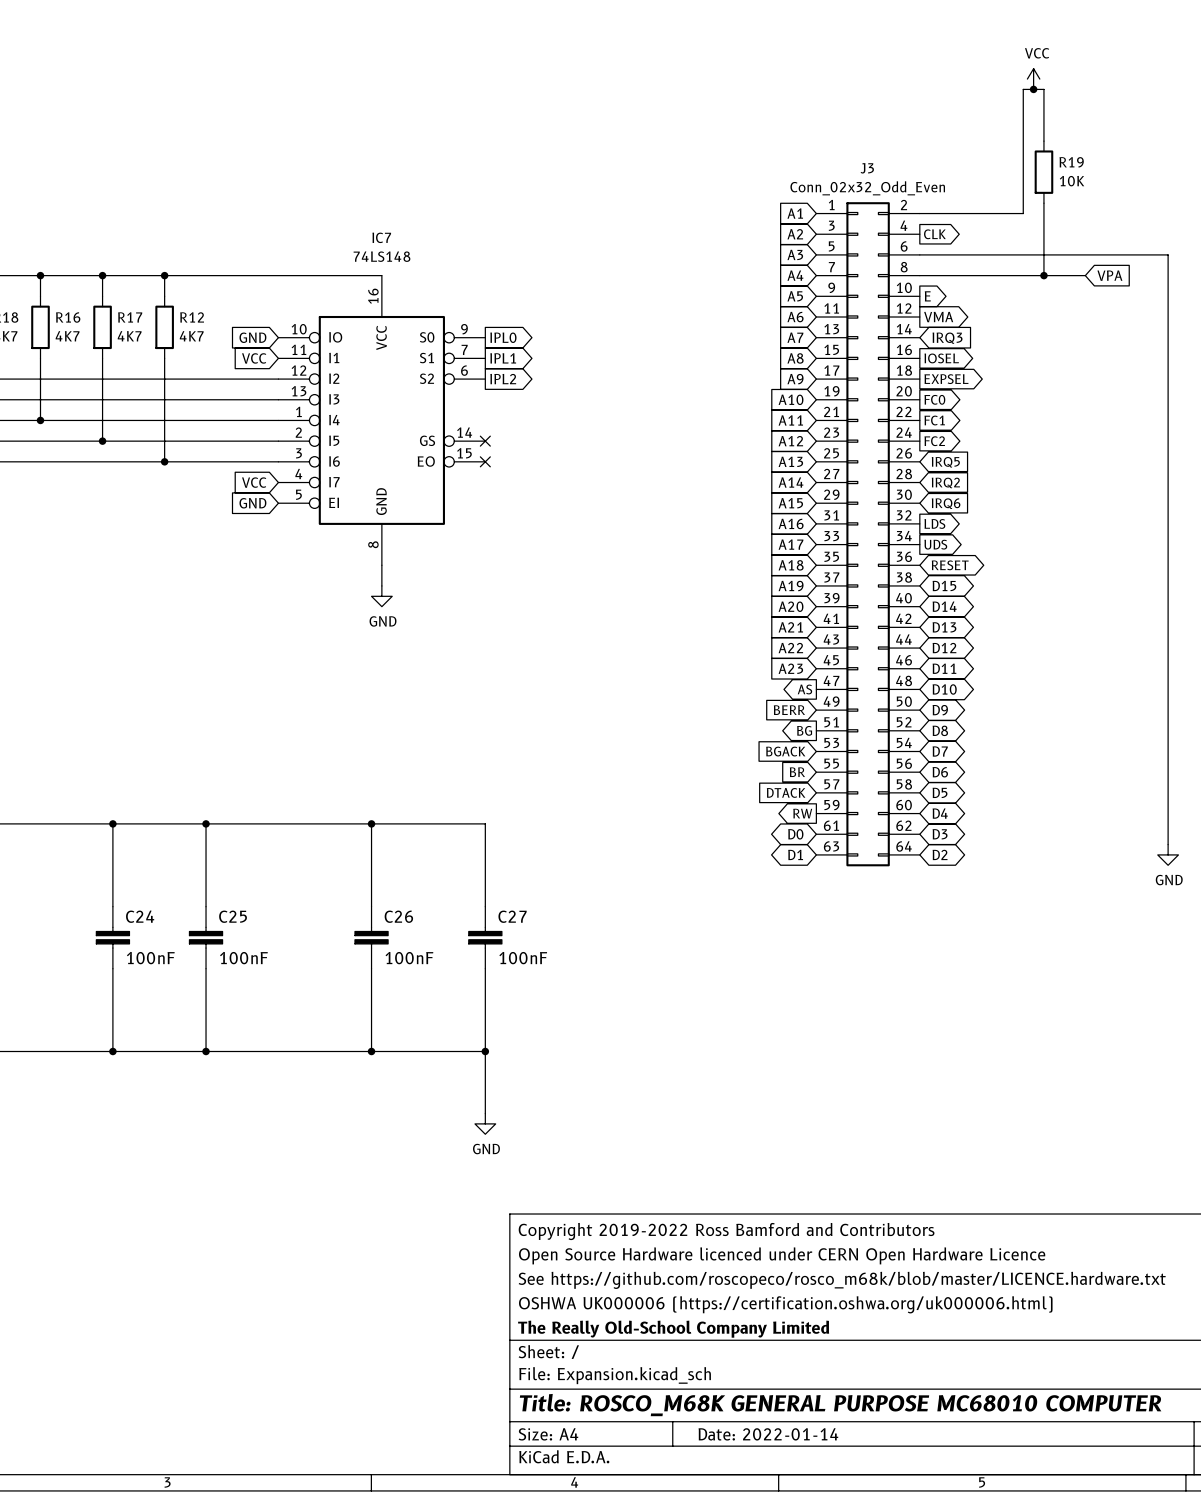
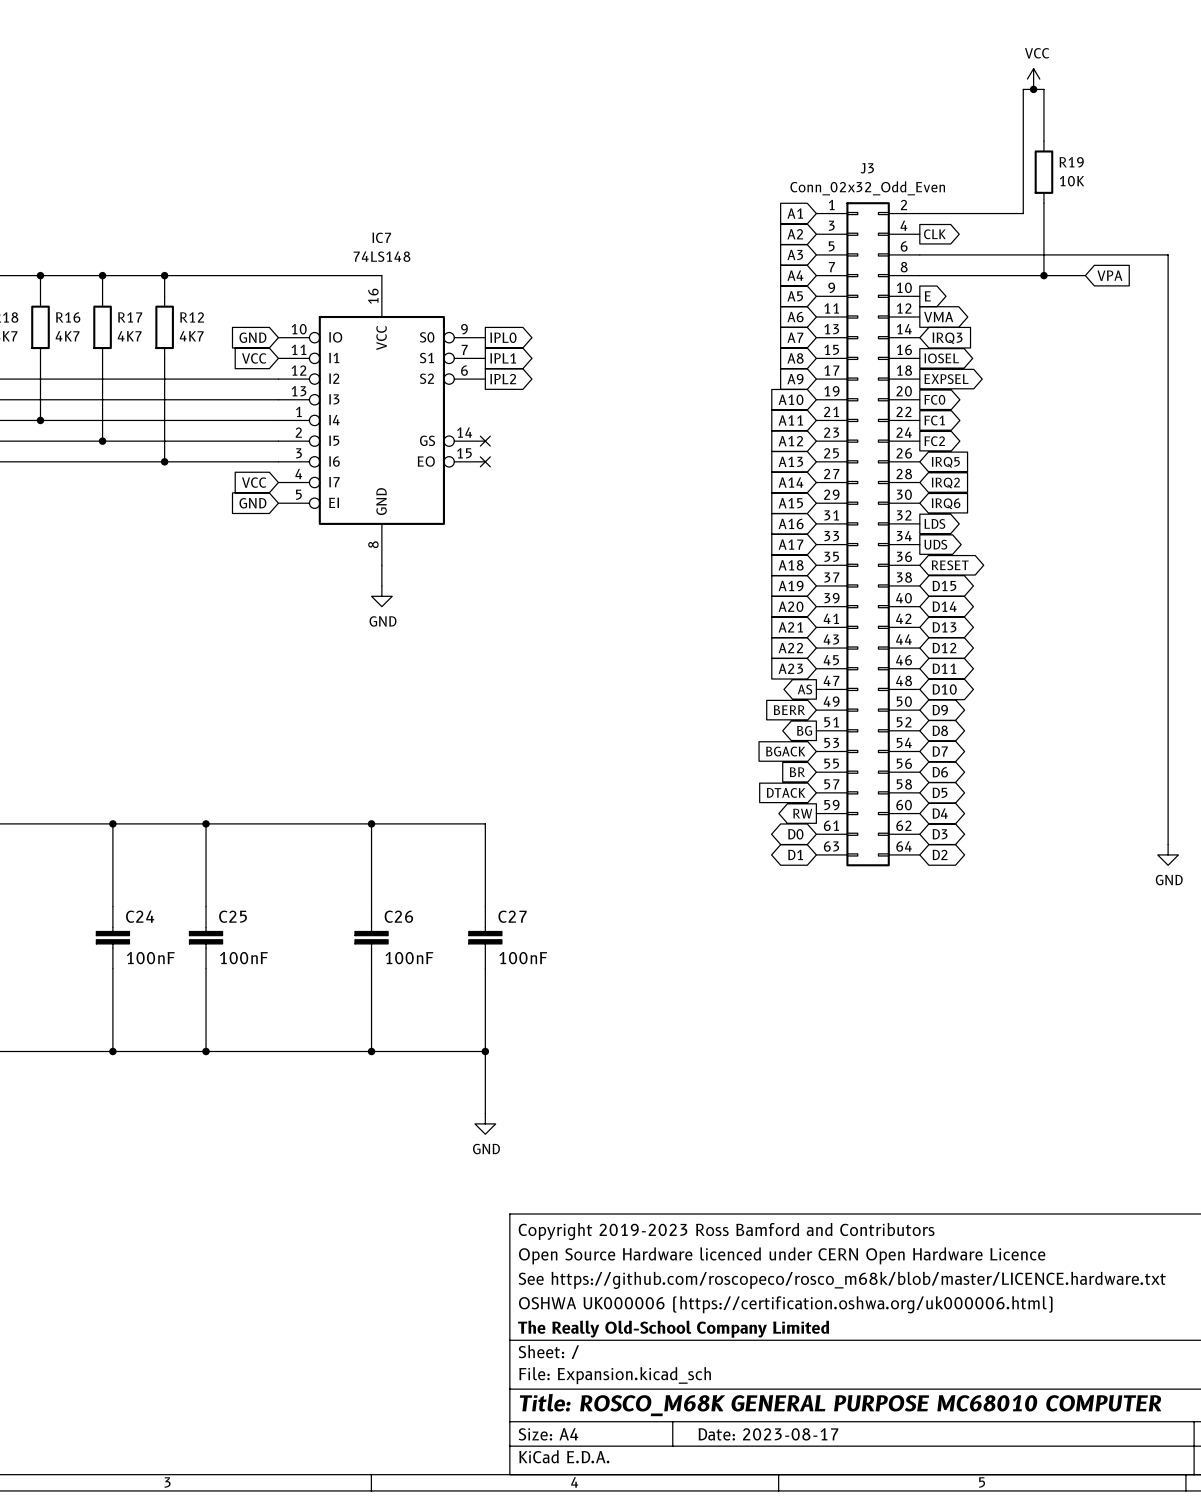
title block: Copyright 2019-2022 Ross Bamford and Contributors (726, 1231) -> Copyright 2019-2023 Ross Bamford and Contributors (726, 1231)
title block: Date: 2022-01-14 (768, 1434) -> Date: 2023-08-17 (768, 1434)

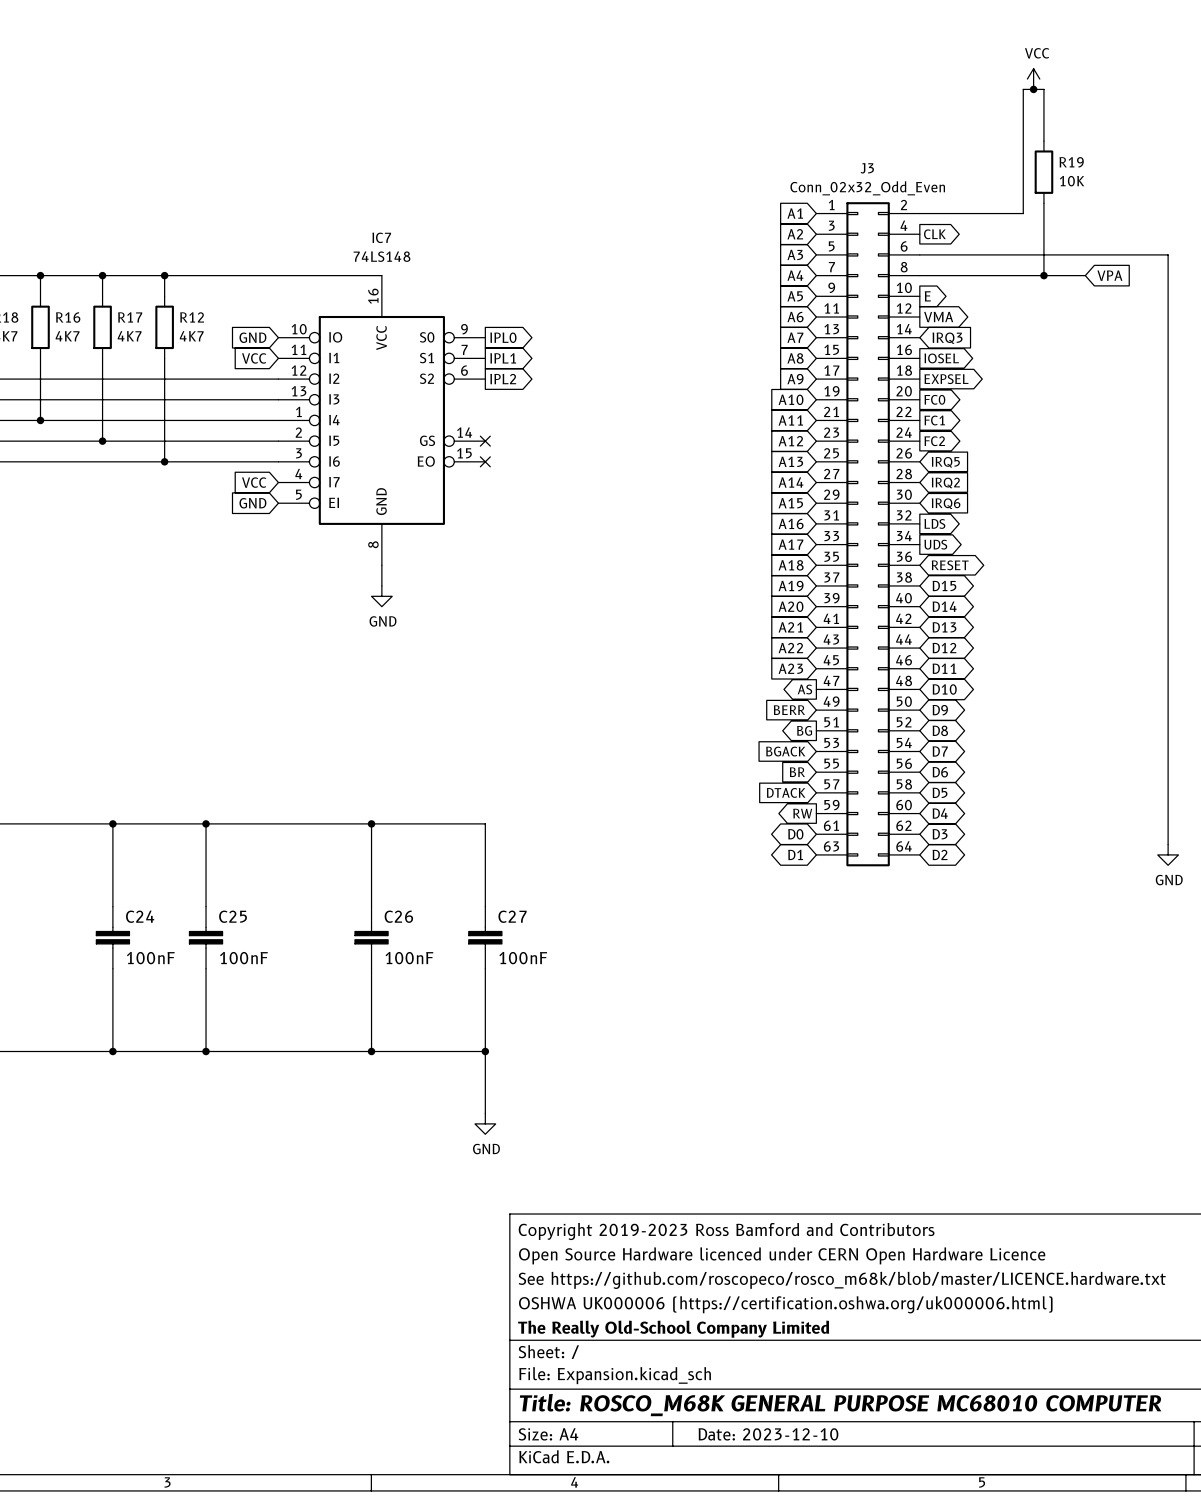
title block: Date: 2023-08-17 (768, 1434) -> Date: 2023-12-10 (768, 1434)

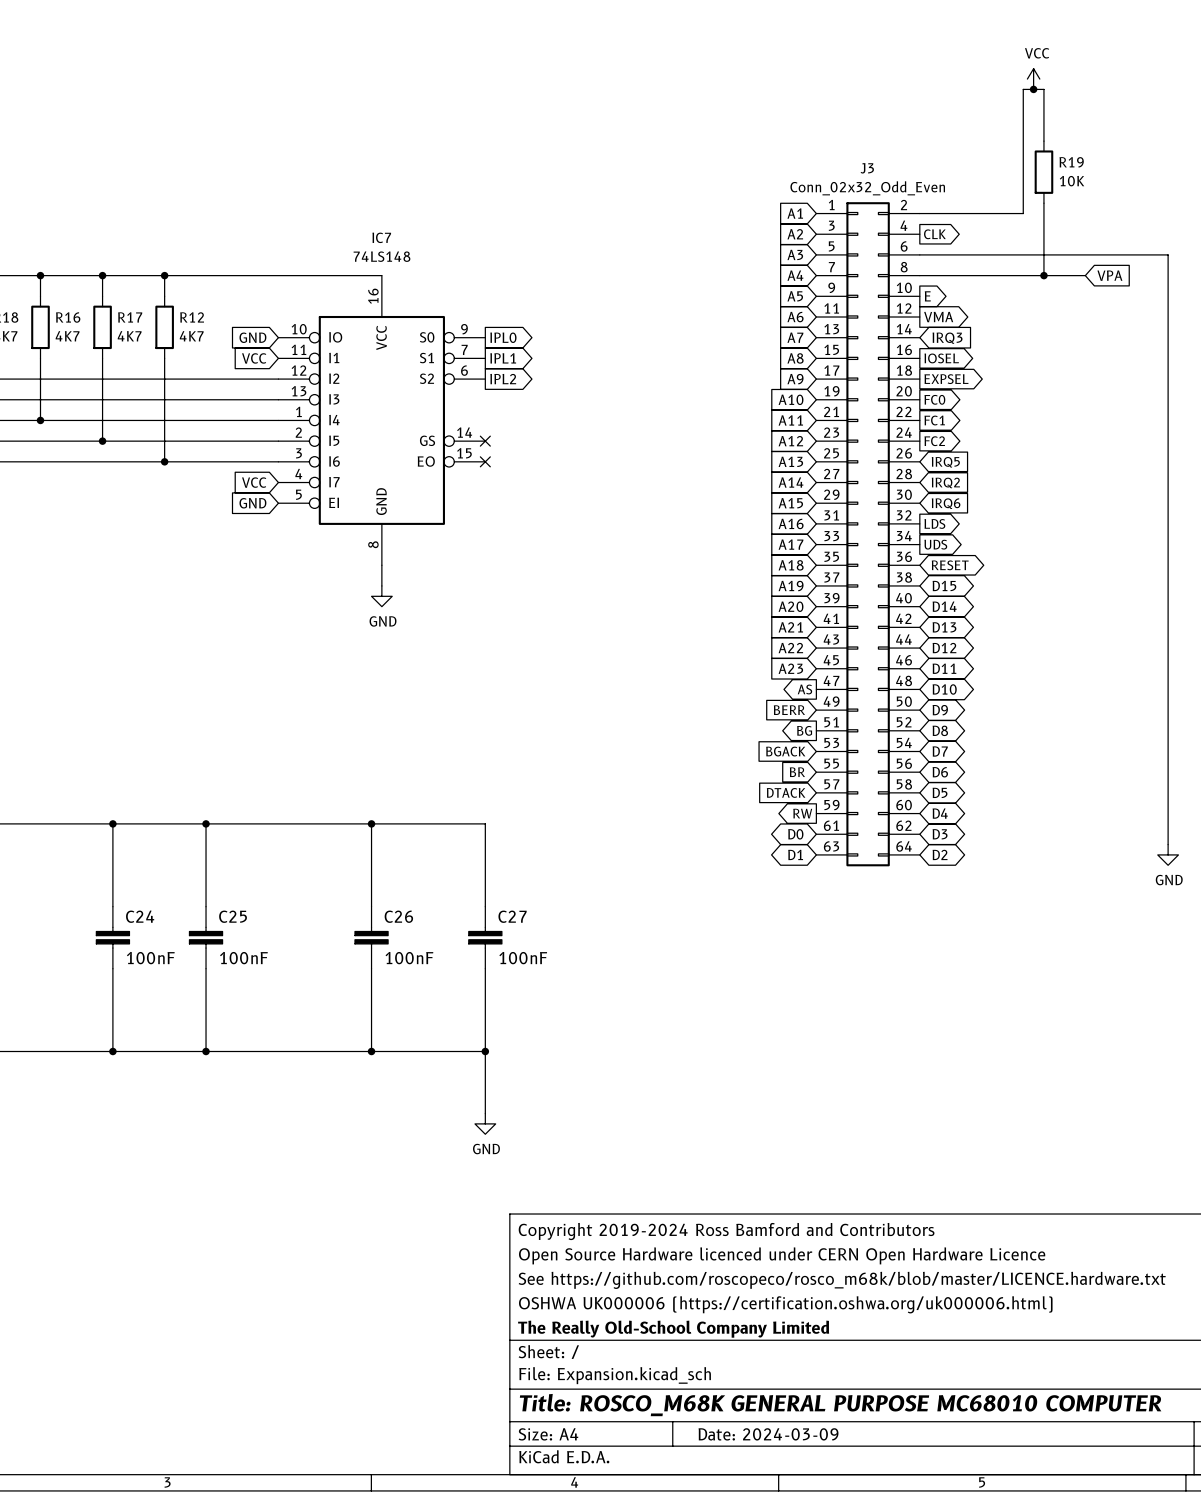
title block: Copyright 2019-2023 Ross Bamford and Contributors (726, 1231) -> Copyright 2019-2024 Ross Bamford and Contributors (726, 1231)
title block: Date: 2023-12-10 (768, 1434) -> Date: 2024-03-09 (768, 1434)

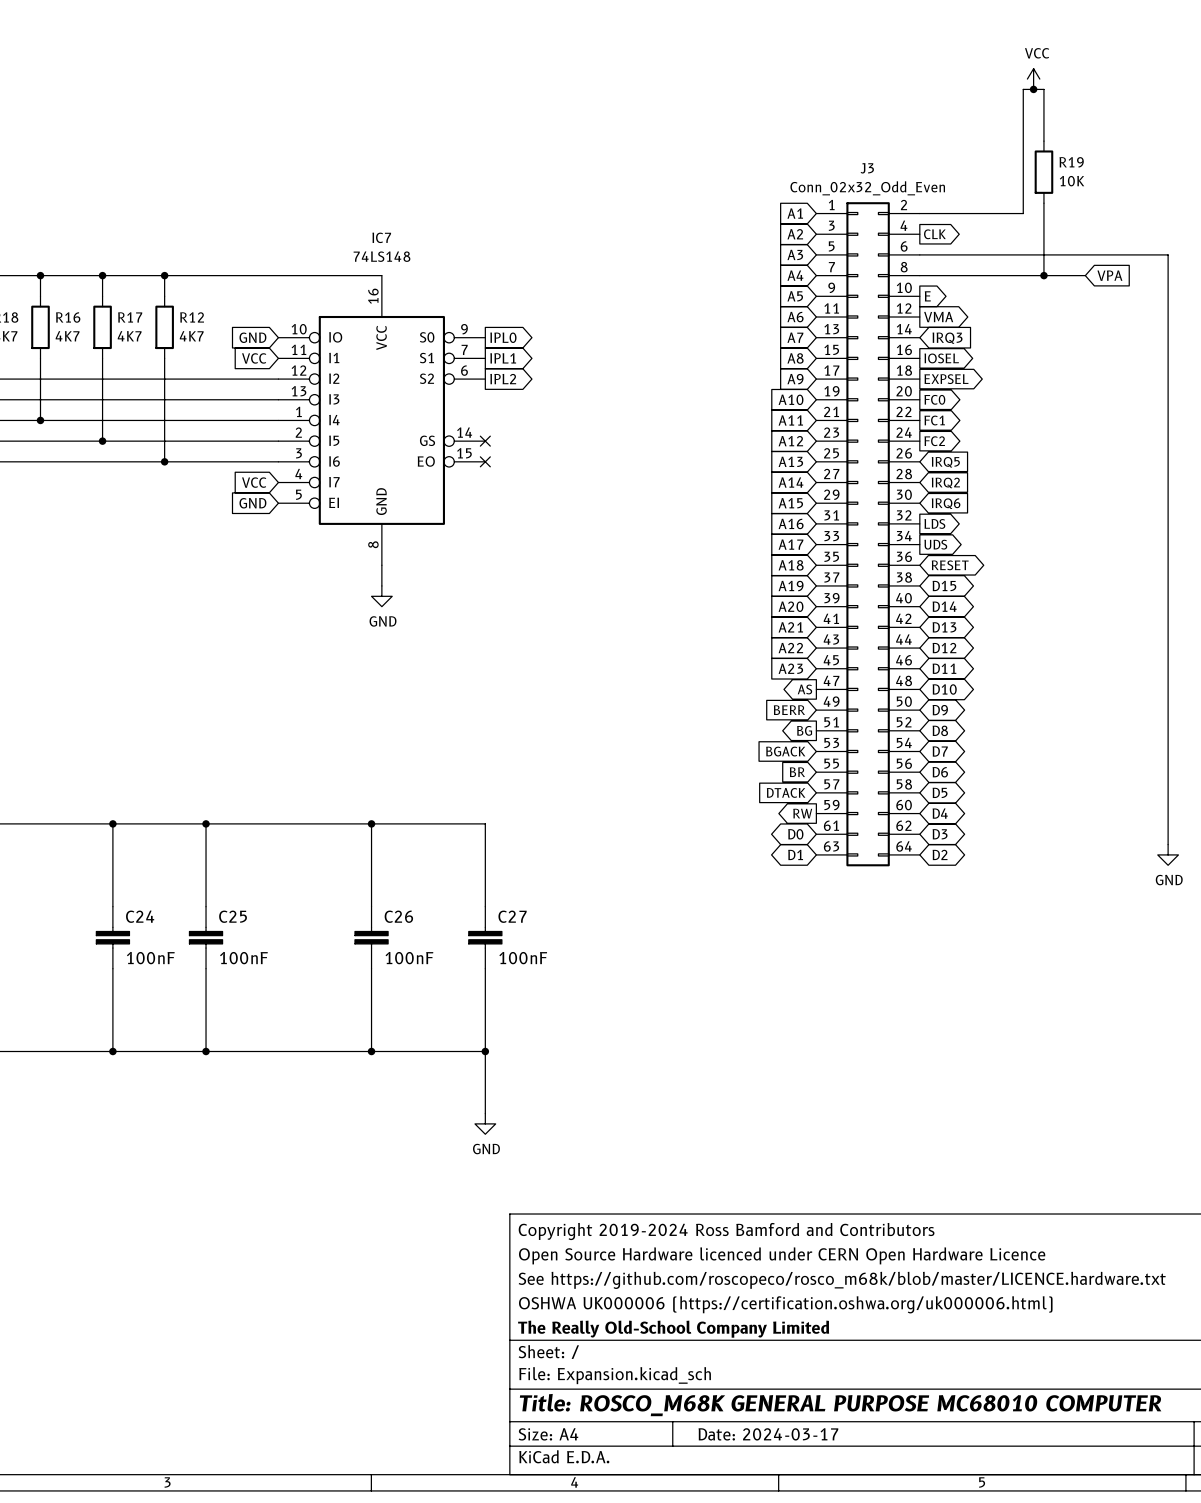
title block: Date: 2024-03-09 (768, 1434) -> Date: 2024-03-17 (768, 1434)

